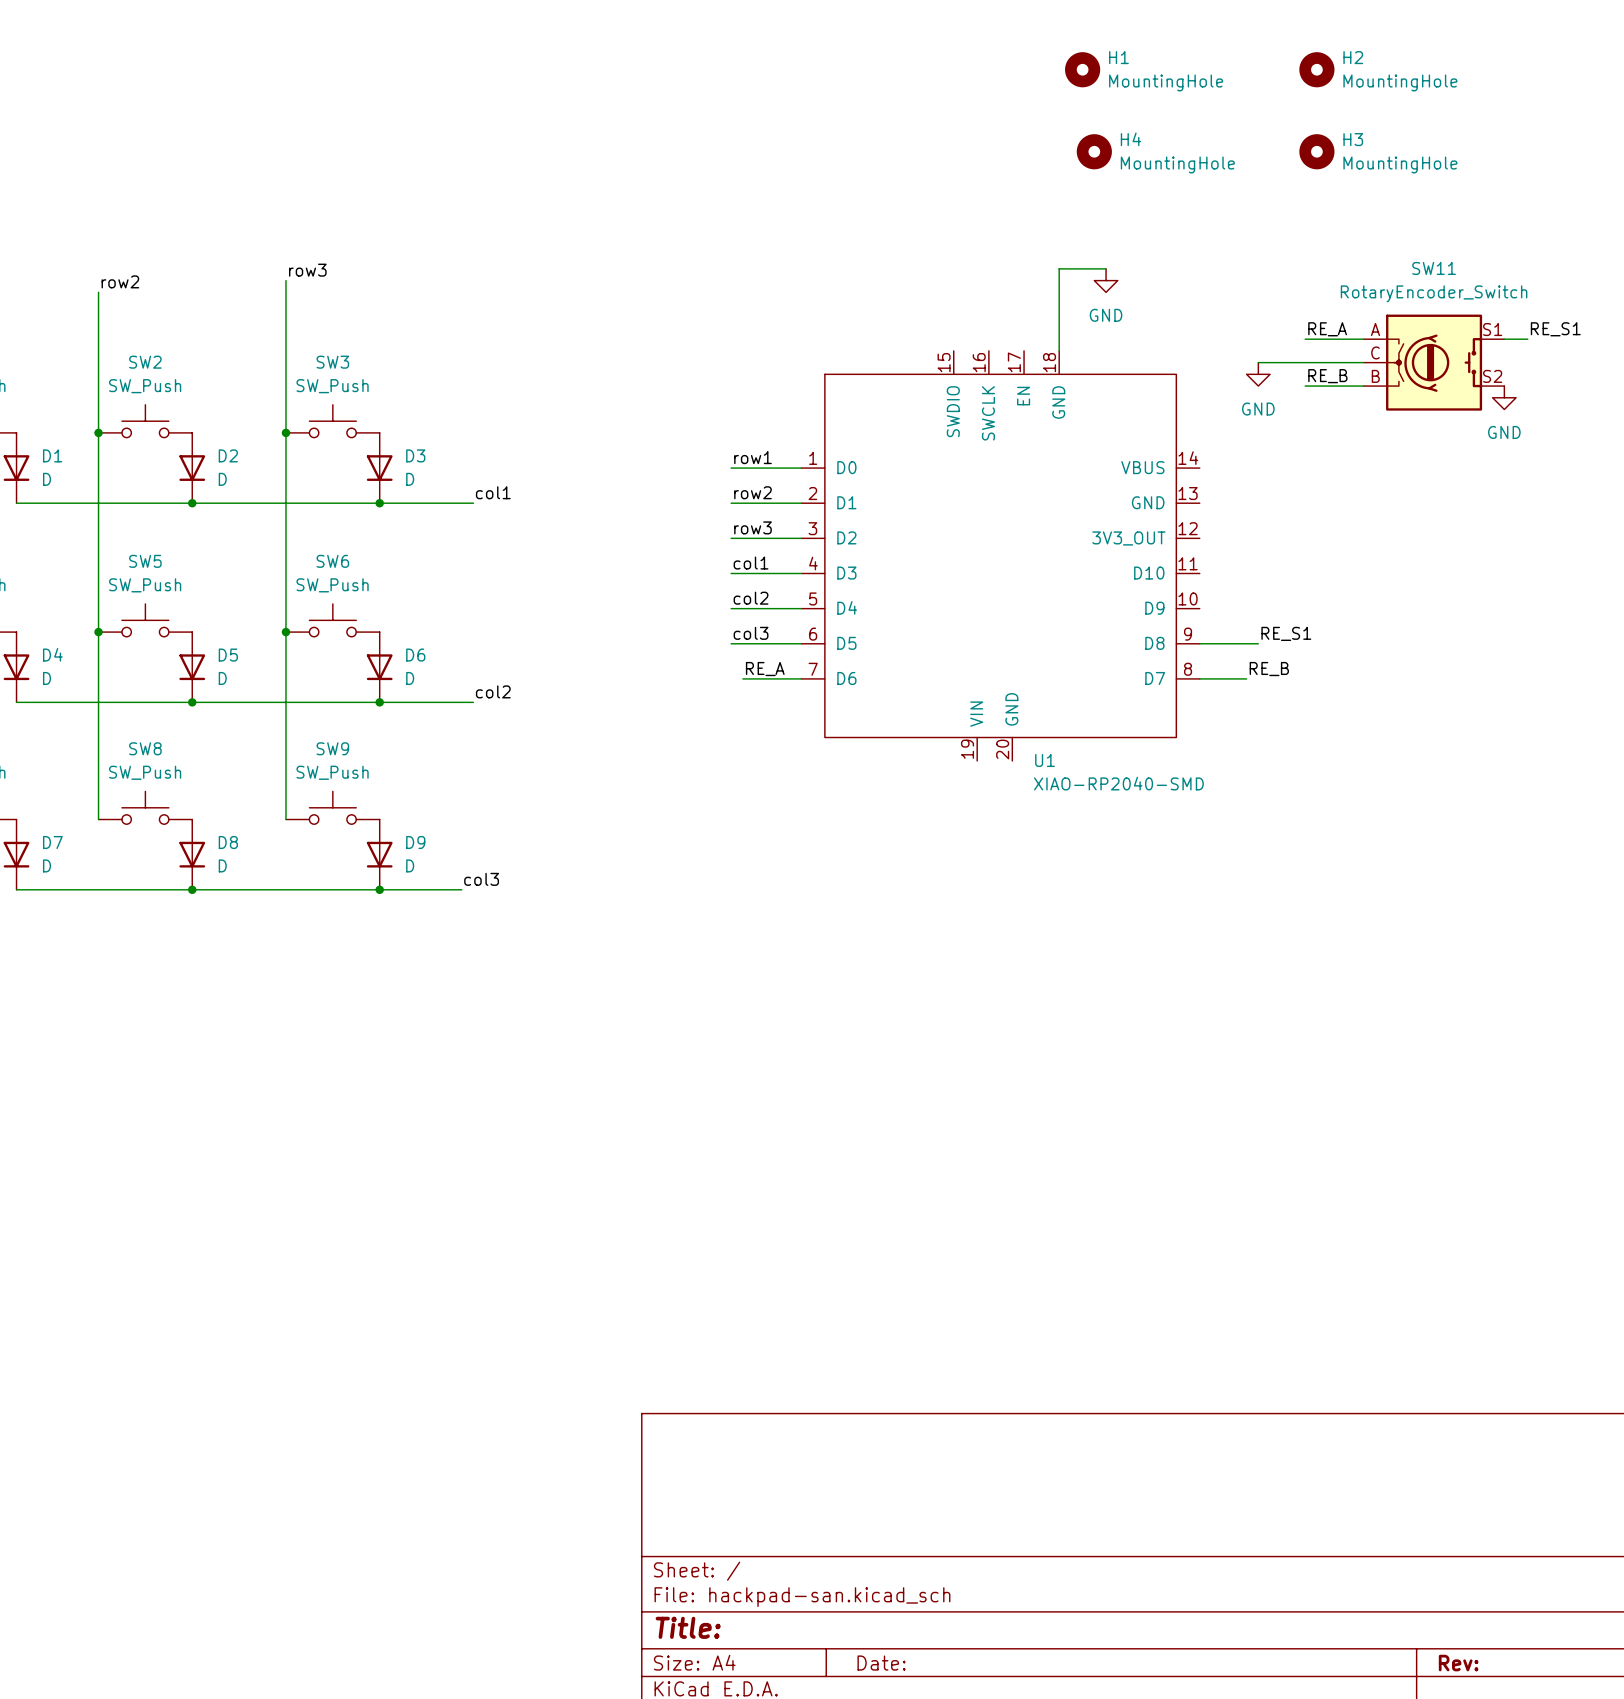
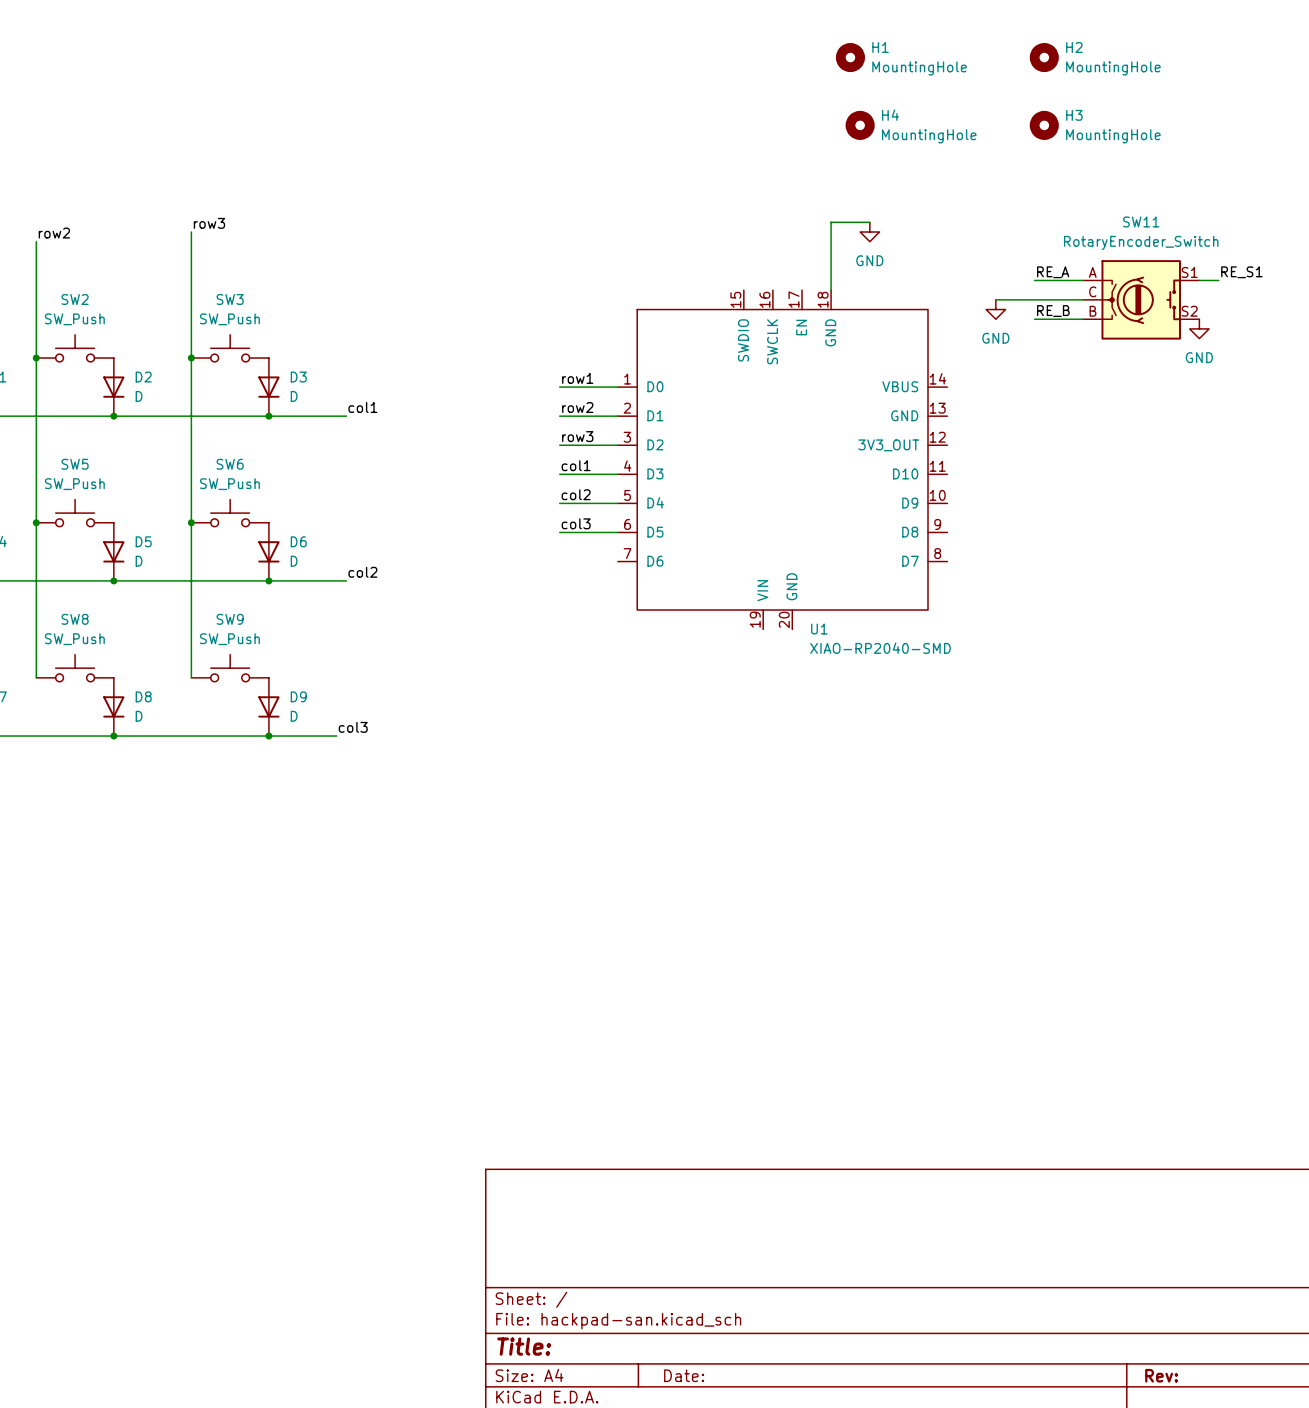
label: RE_S1 (1286, 633) -> none
wire: (1199, 643) (1258, 643) -> none
label: RE_A (765, 669) -> none
label: RE_B (1269, 669) -> none
wire: (742, 678) (801, 678) -> none
wire: (1199, 678) (1246, 678) -> none

